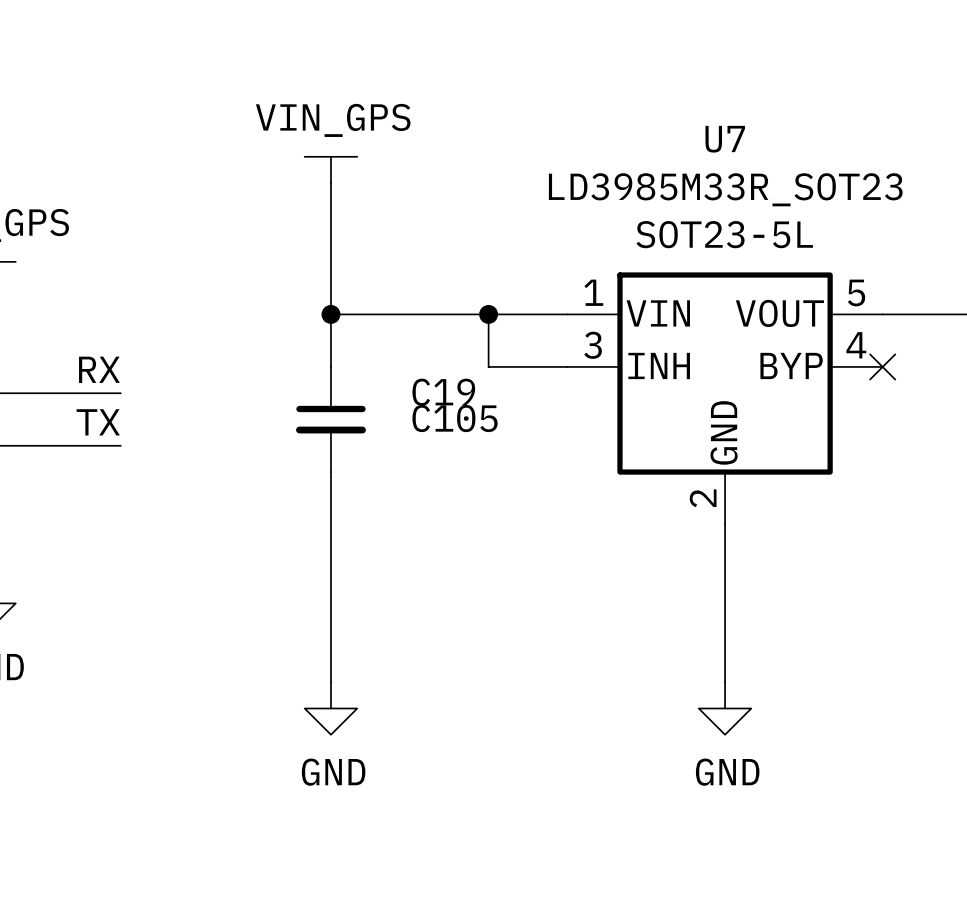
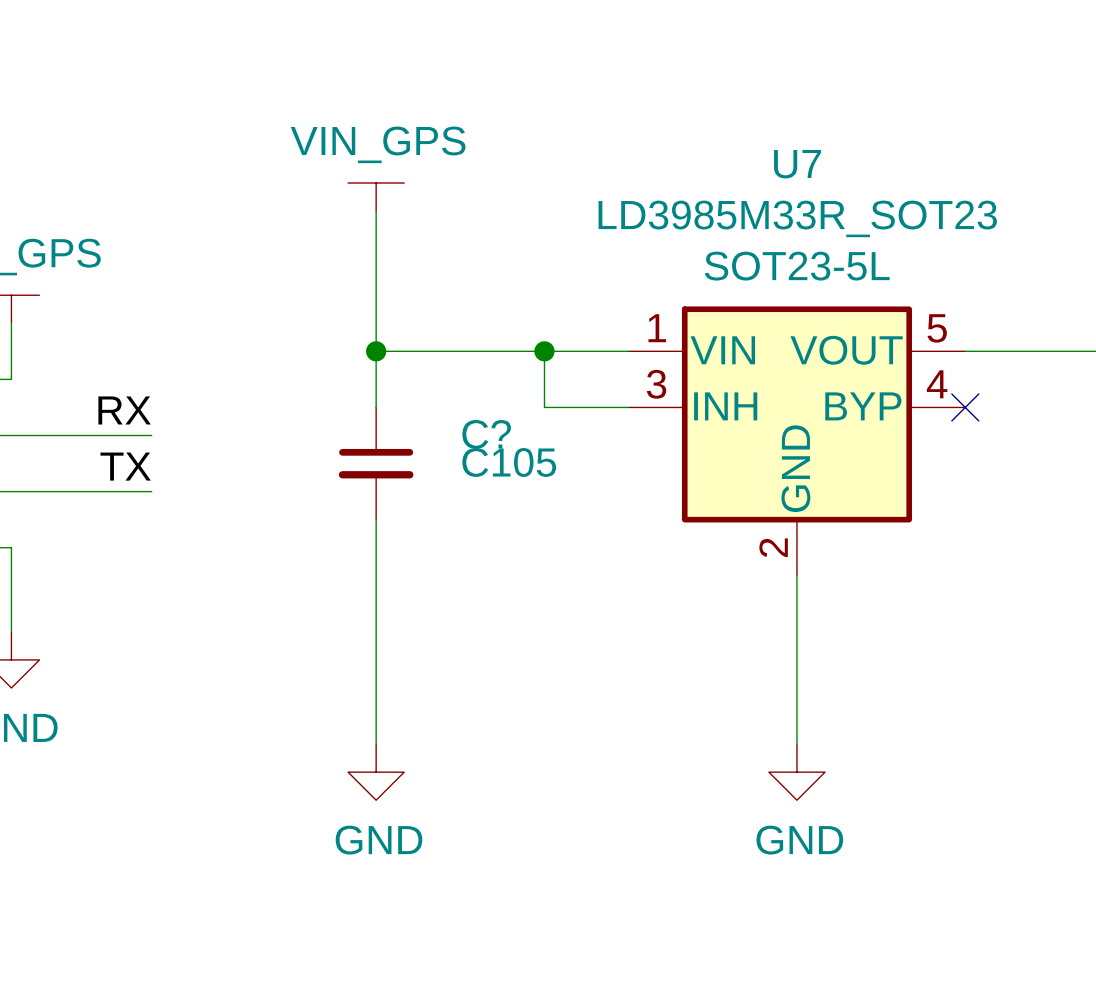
C19 name: C19 (443, 392) -> C? (486, 434)

